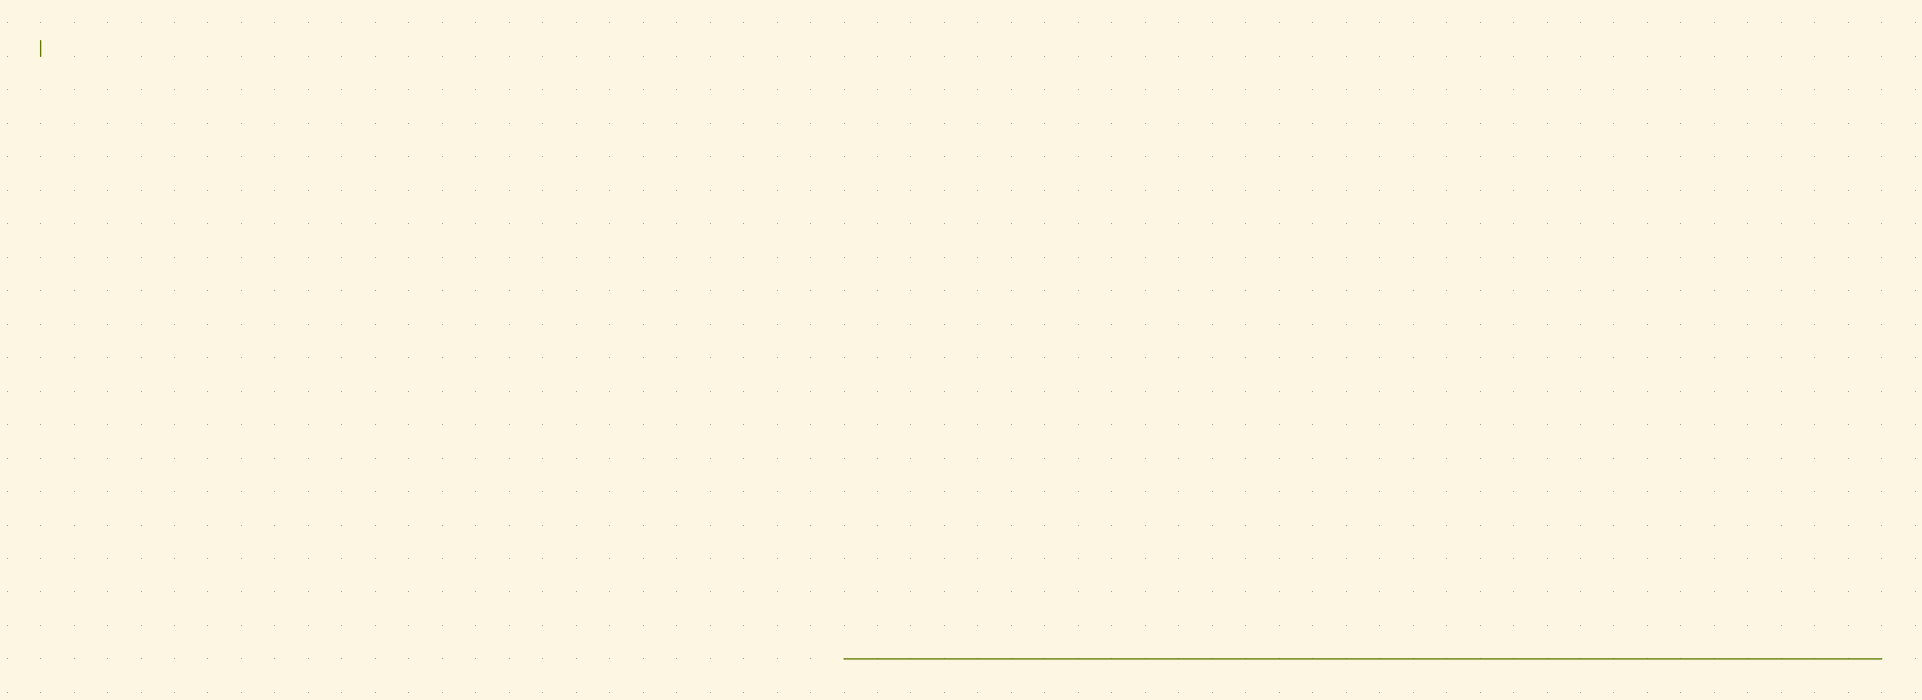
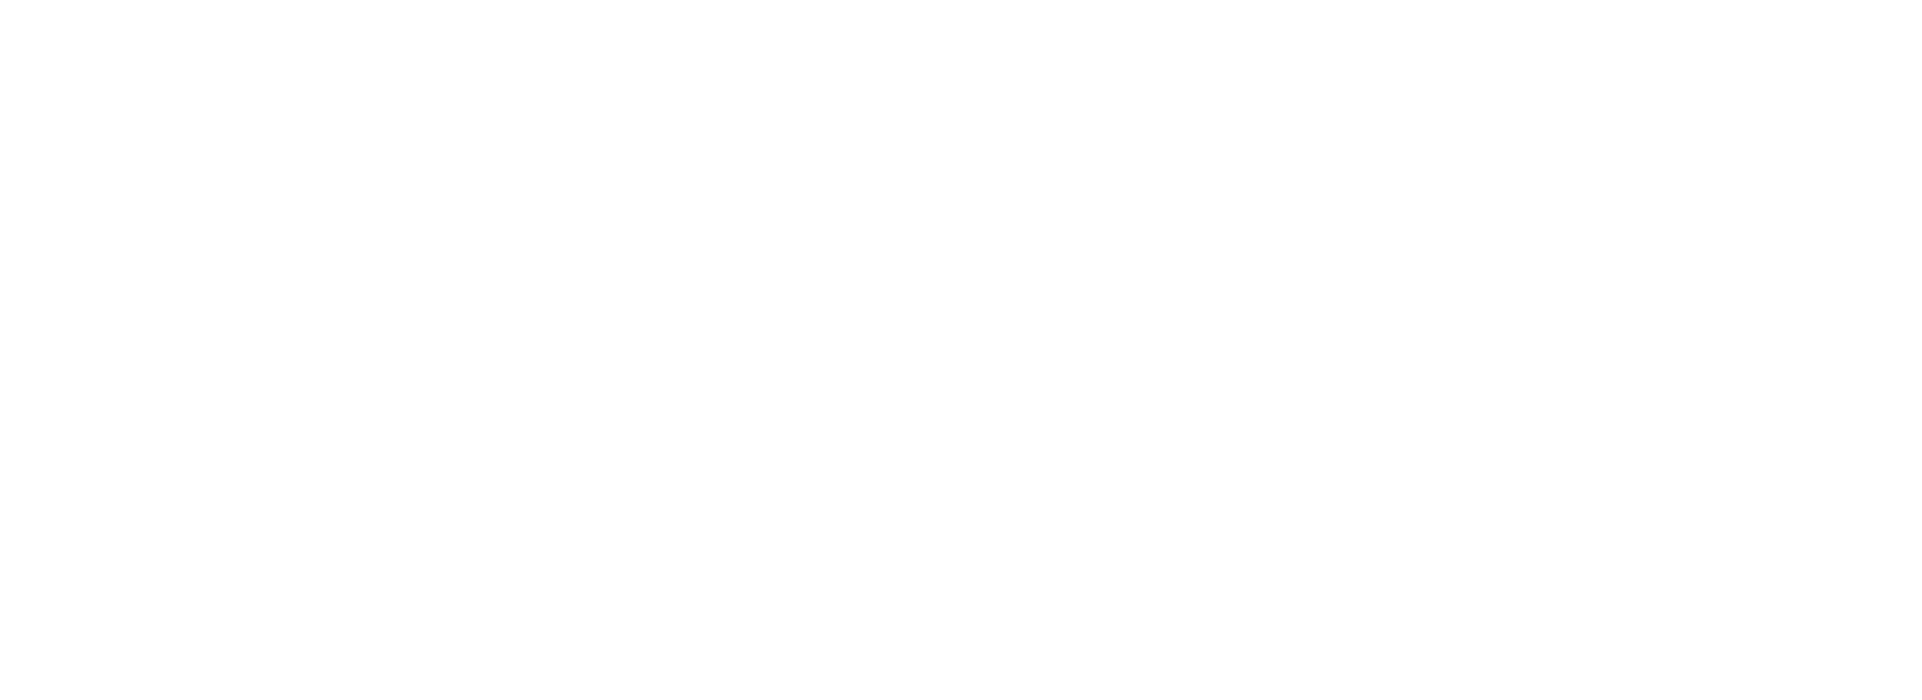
wire: (40, 40) (40, 56) -> none
wire: (844, 658) (1881, 658) -> none

